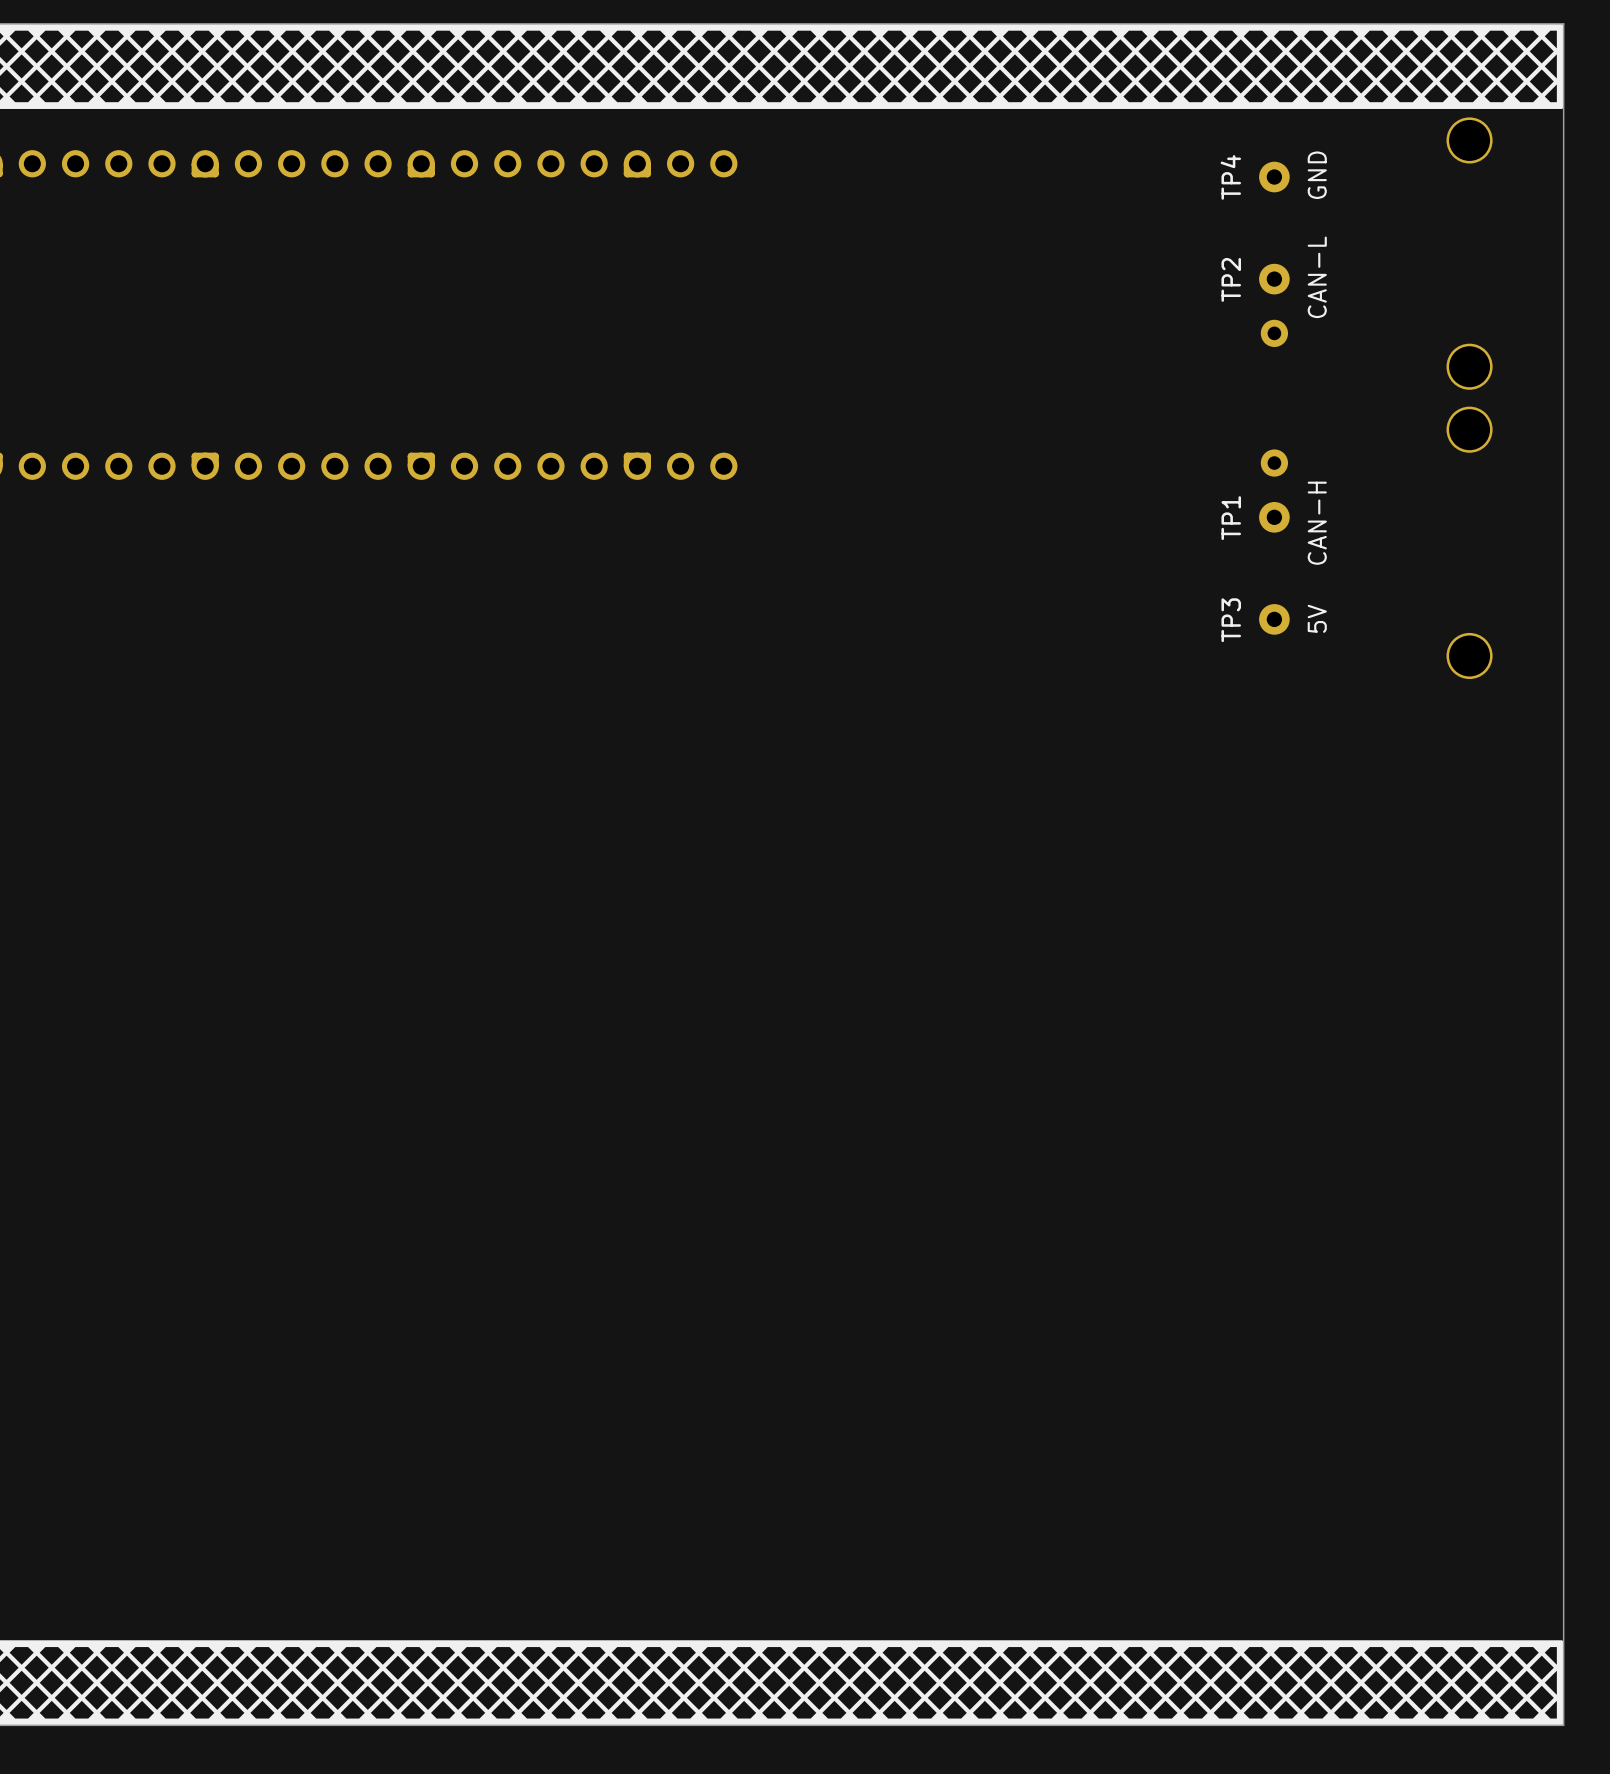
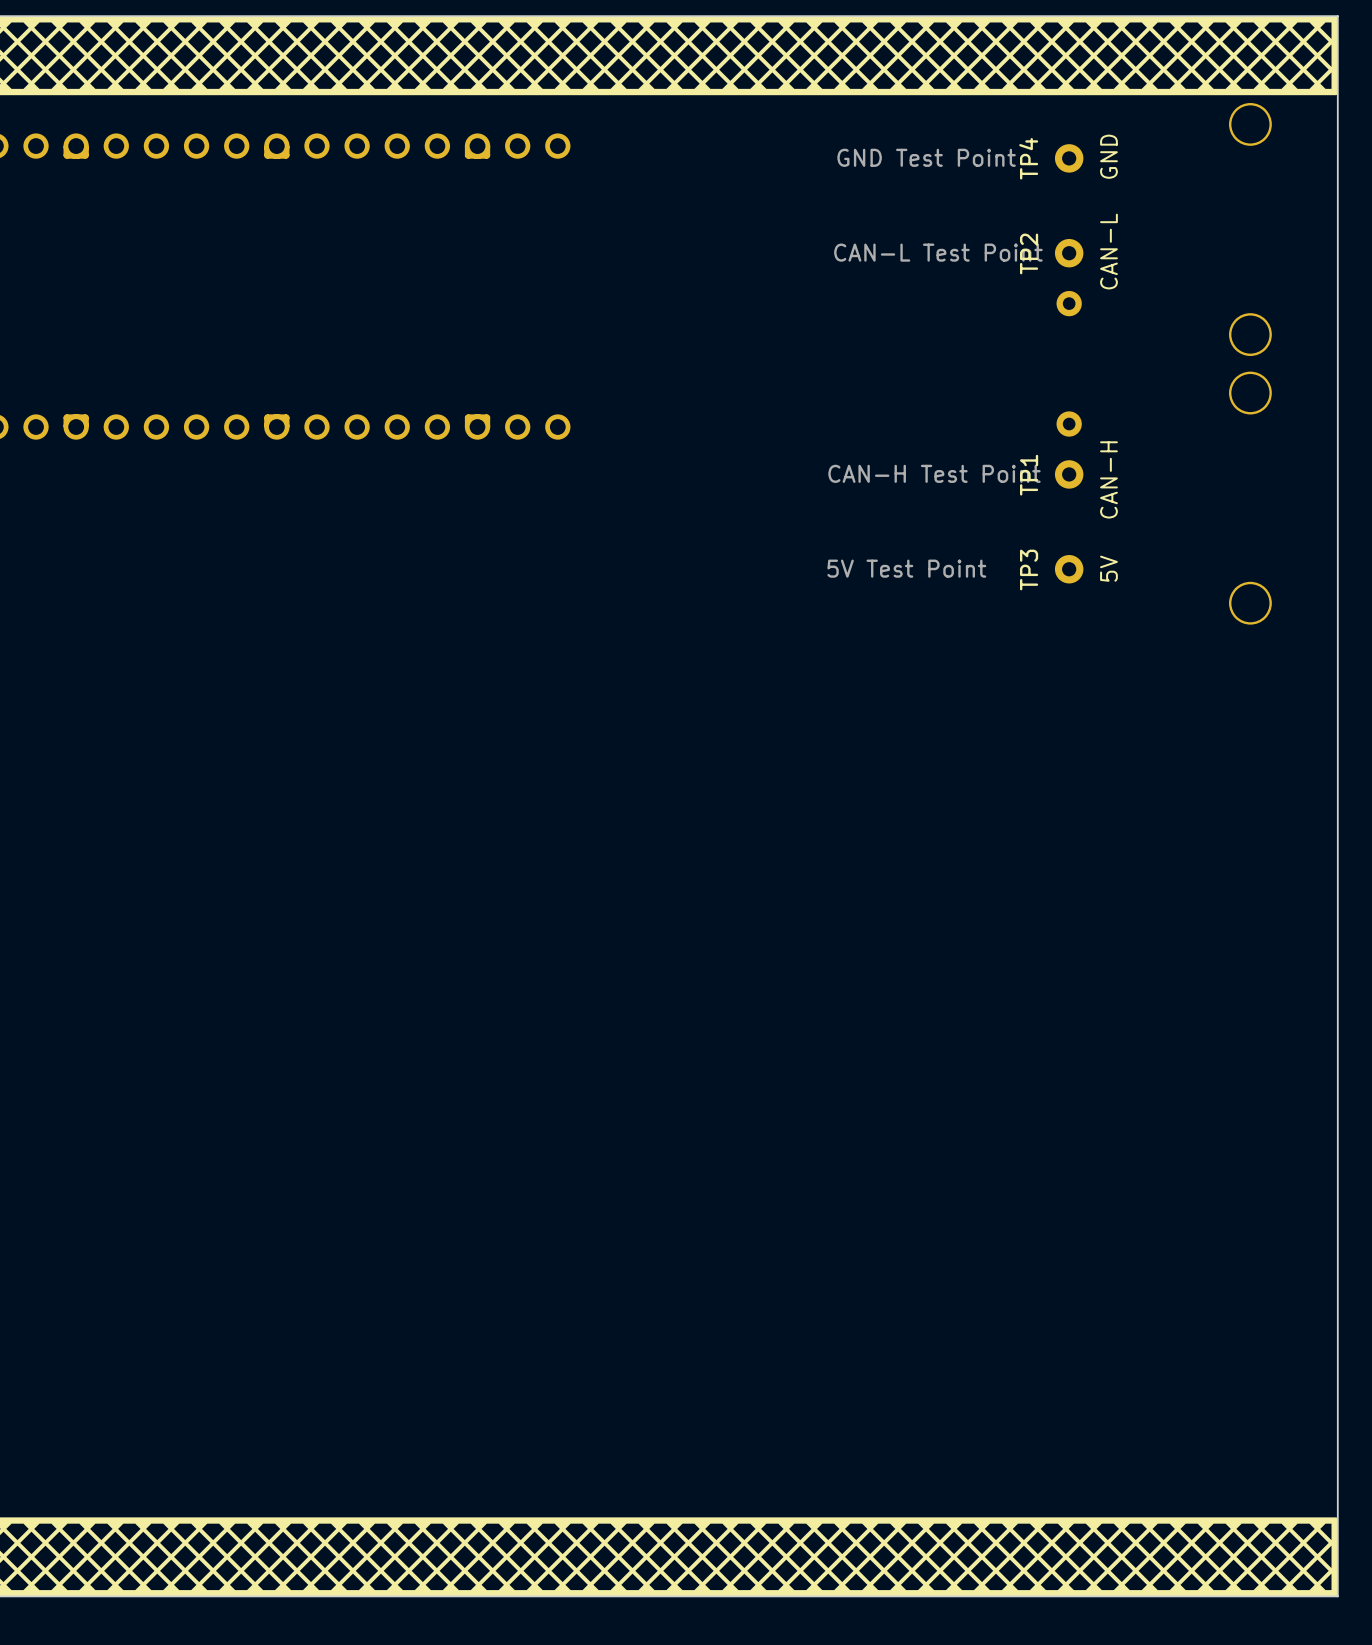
TP4 value: none -> GND Test Point (926, 157)
TP2 value: none -> CAN-L Test Point (938, 252)
TP1 value: none -> CAN-H Test Point (934, 473)
TP3 value: none -> 5V Test Point (906, 568)

